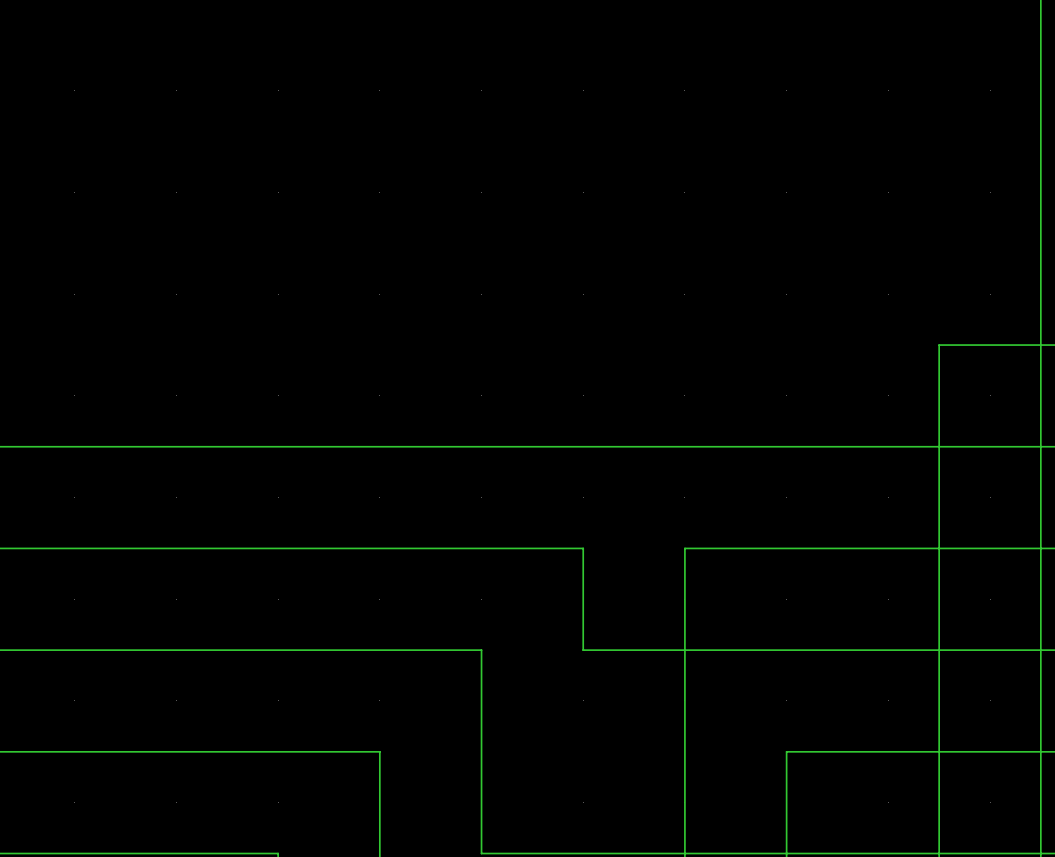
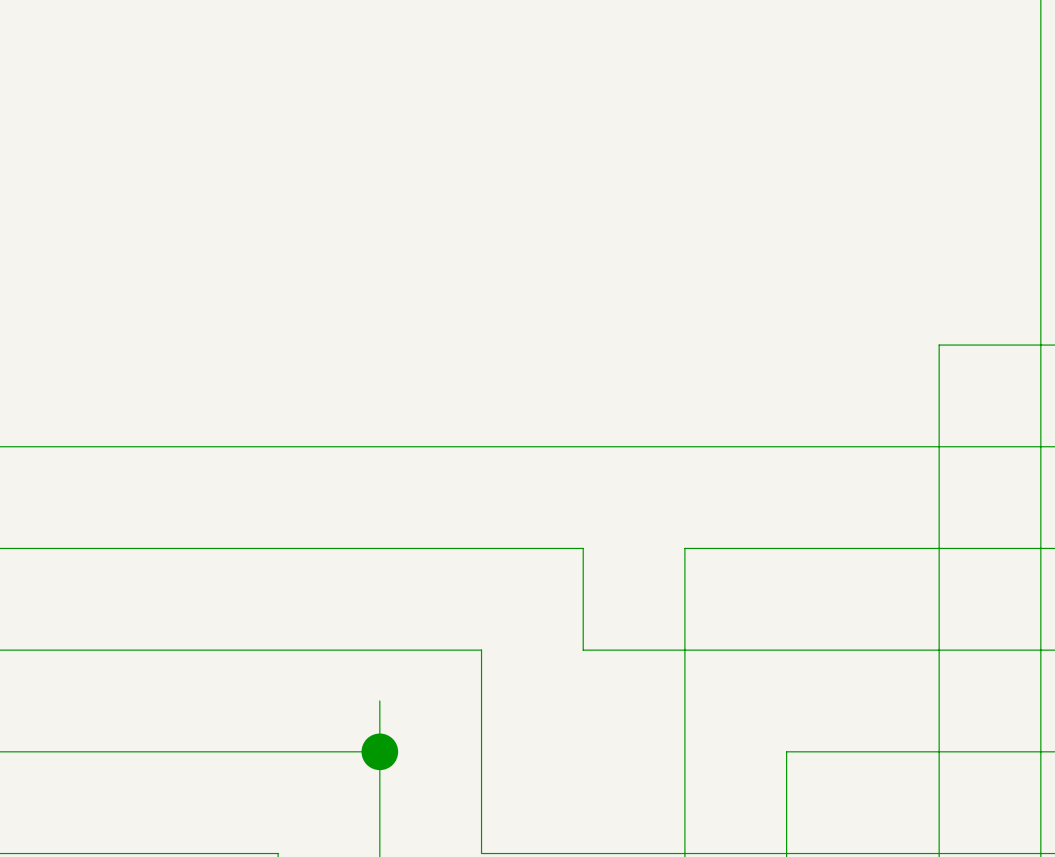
wire: none -> (379, 700) (379, 751)
junction: none -> (379, 751)

